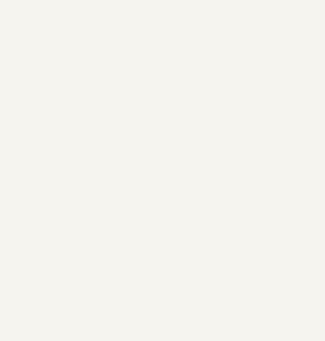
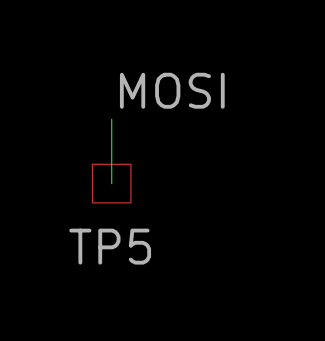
label: none -> MOSI (172, 90)
wire: none -> (111, 119) (111, 183)
TP5: none -> (111, 183)

